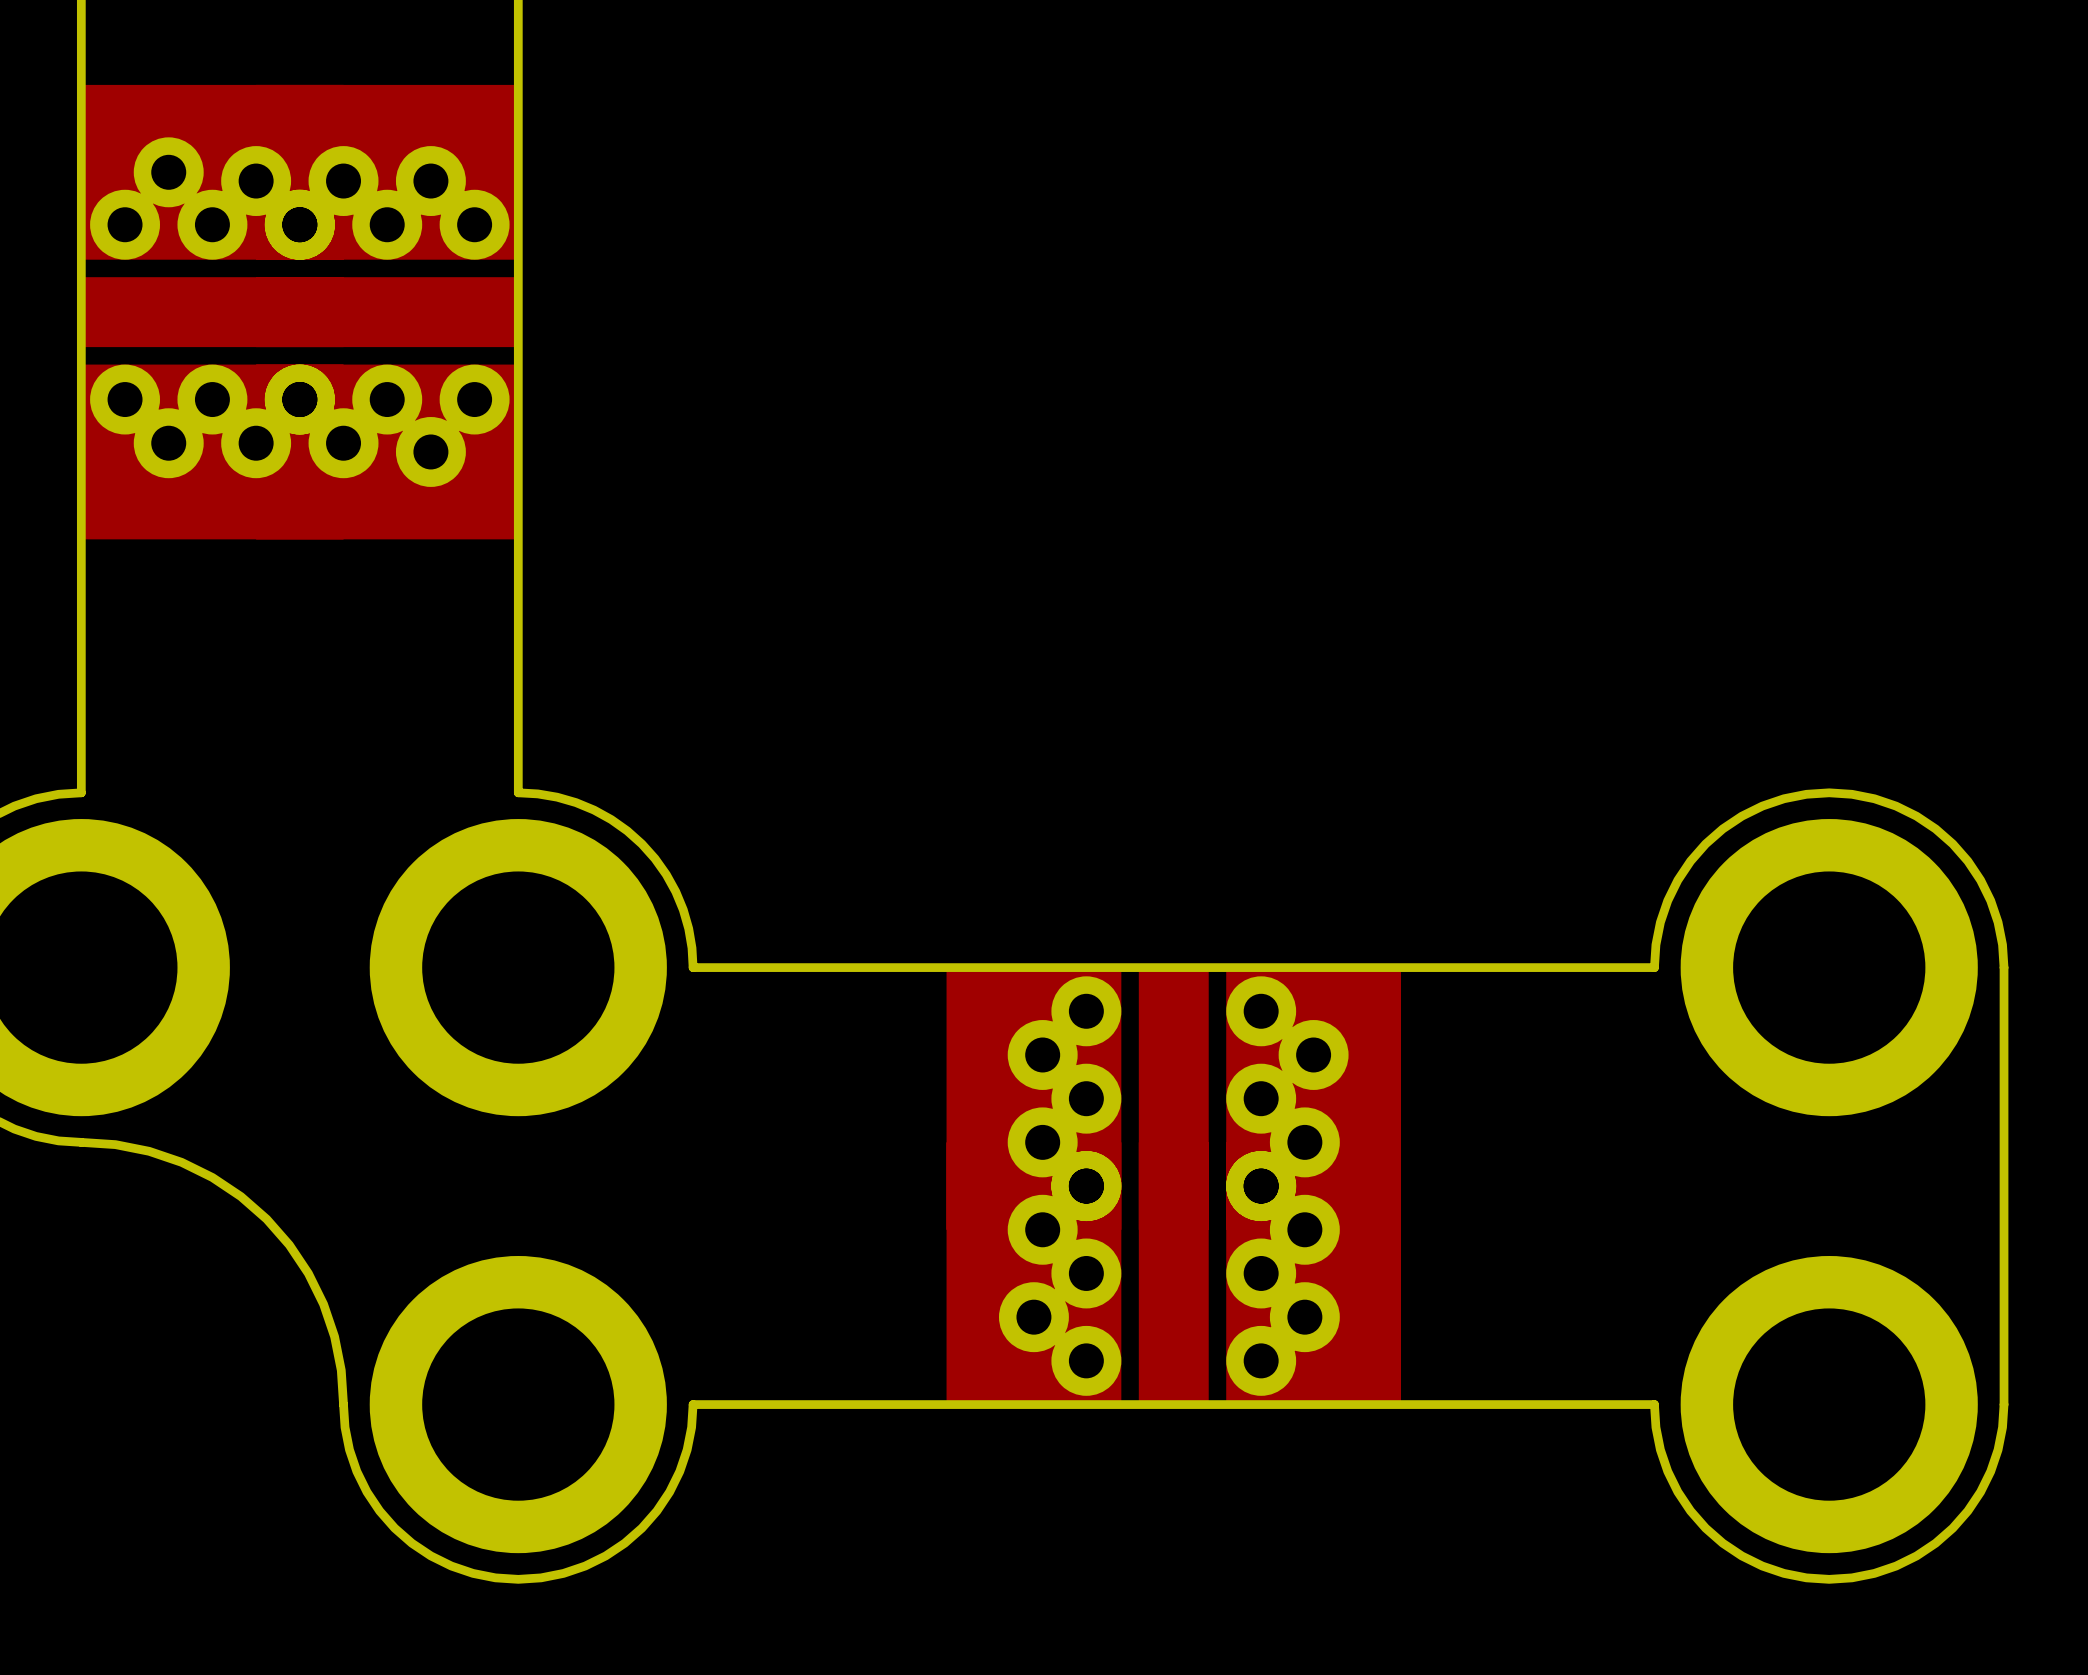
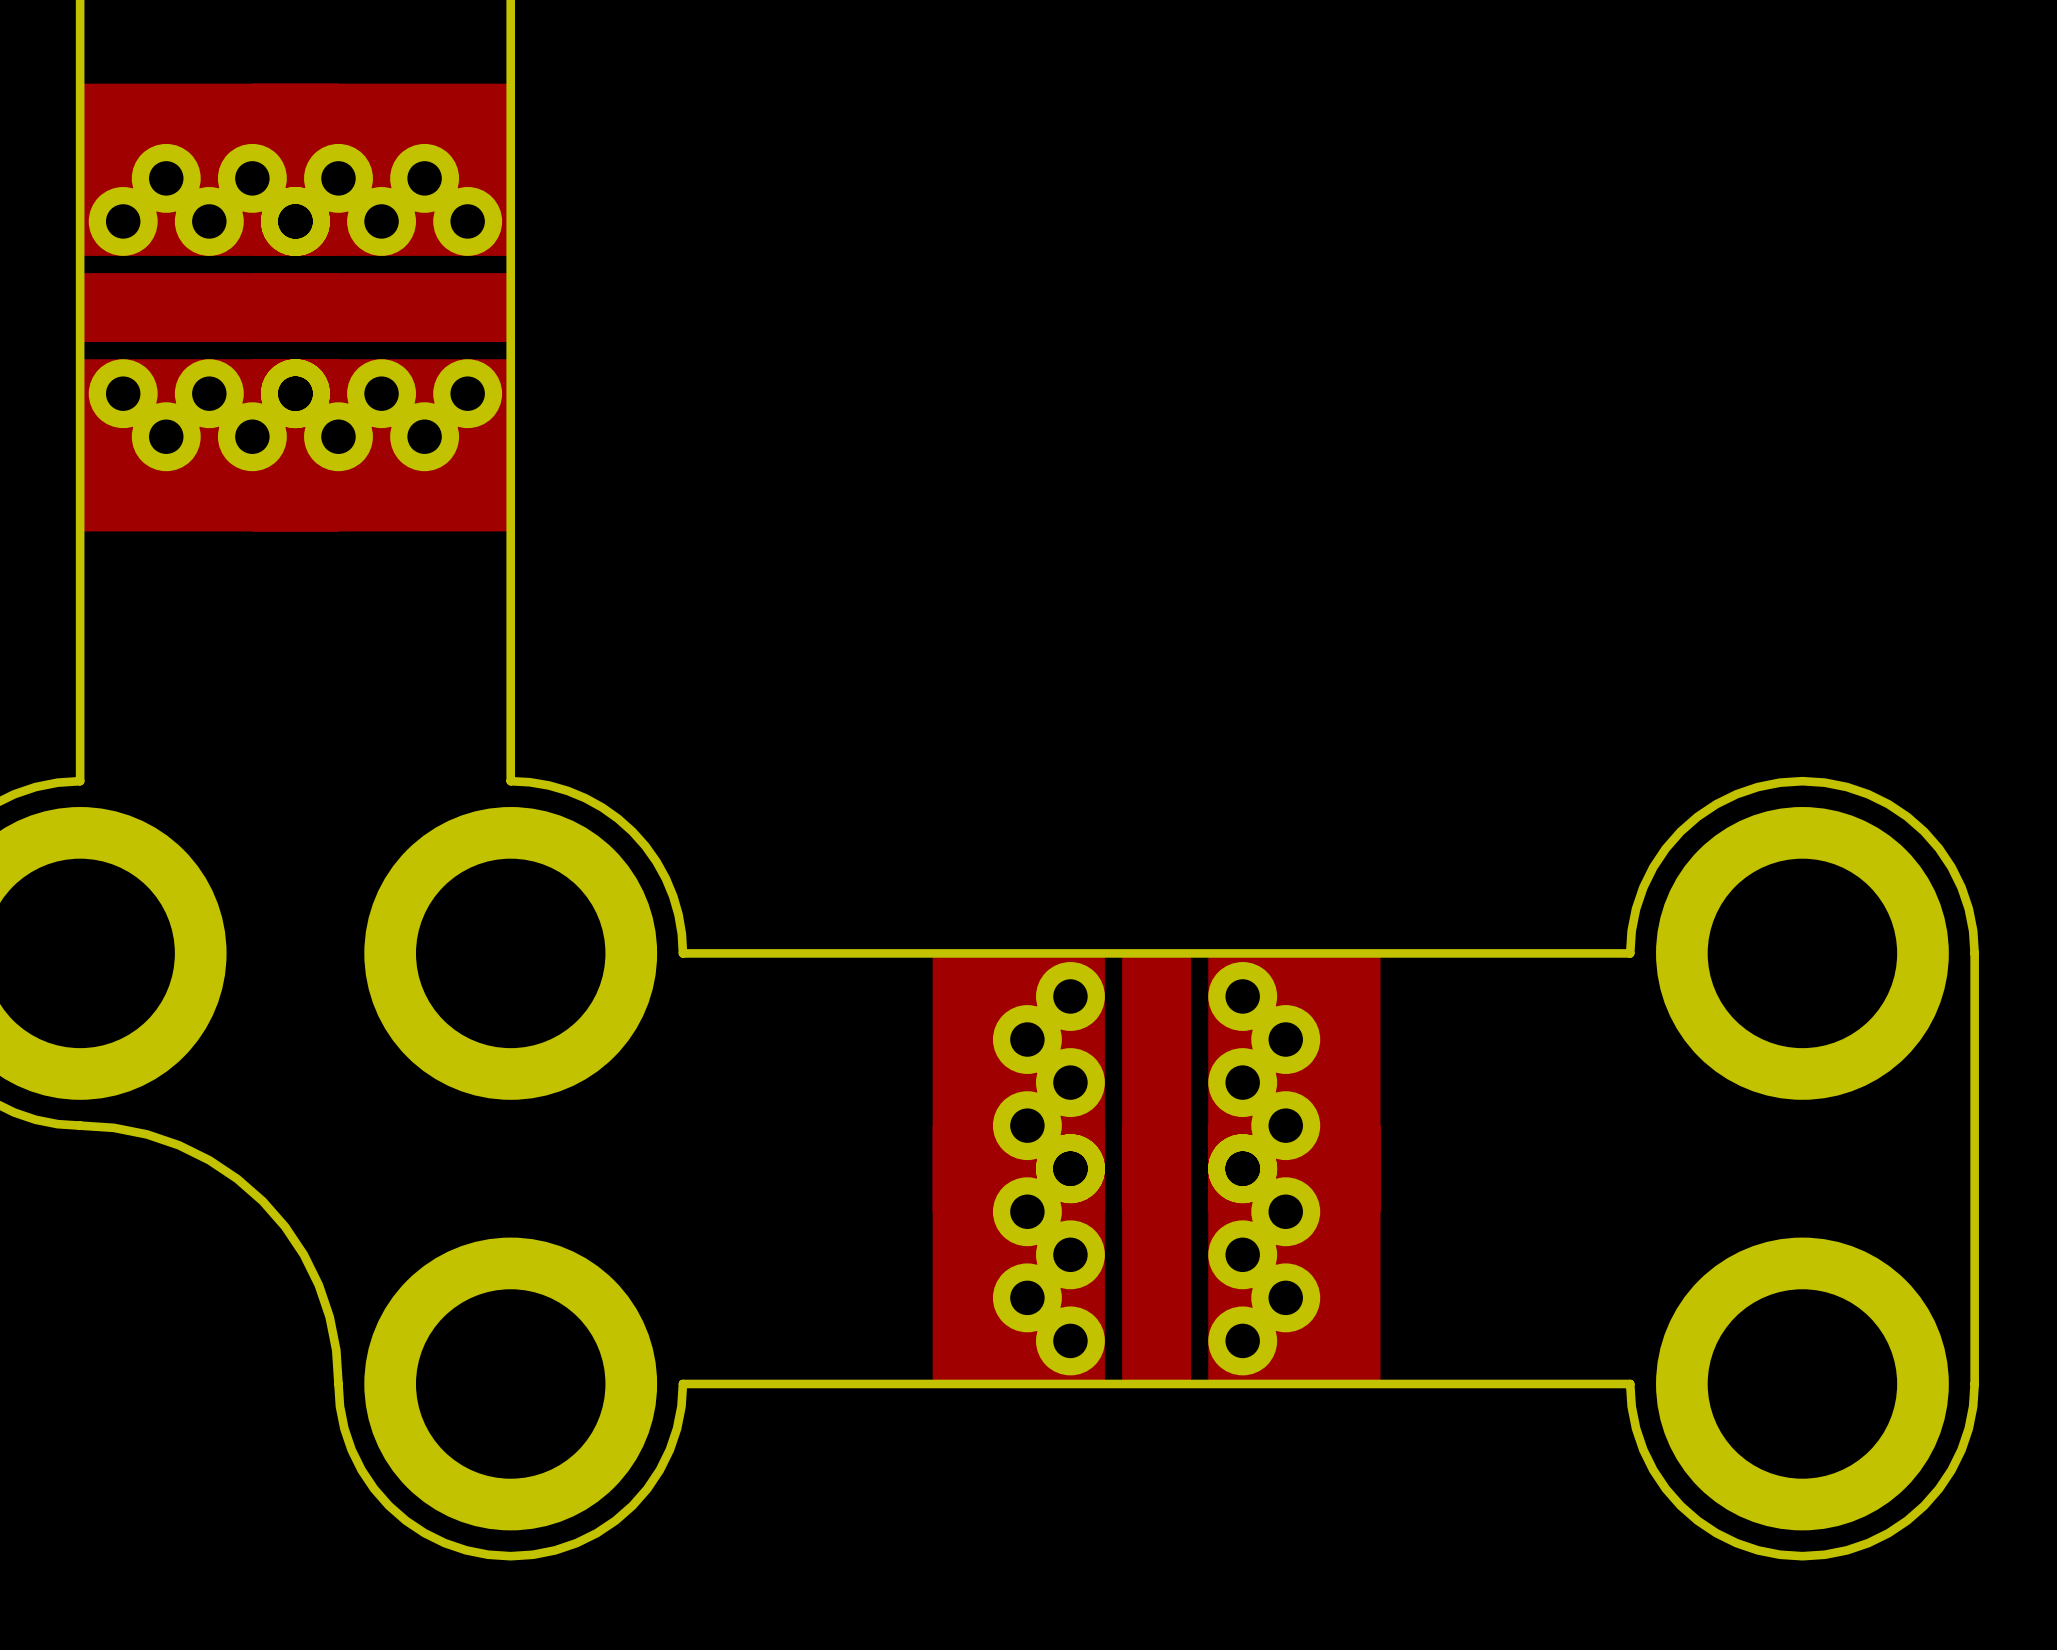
part footprint: [81, 84, 344, 540] -> [80, 83, 339, 532]
part footprint: [256, 84, 519, 540] -> [252, 83, 511, 532]
part footprint: [946, 967, 1402, 1230] -> [932, 953, 1381, 1212]
part footprint: [946, 1142, 1402, 1405] -> [932, 1125, 1381, 1384]

